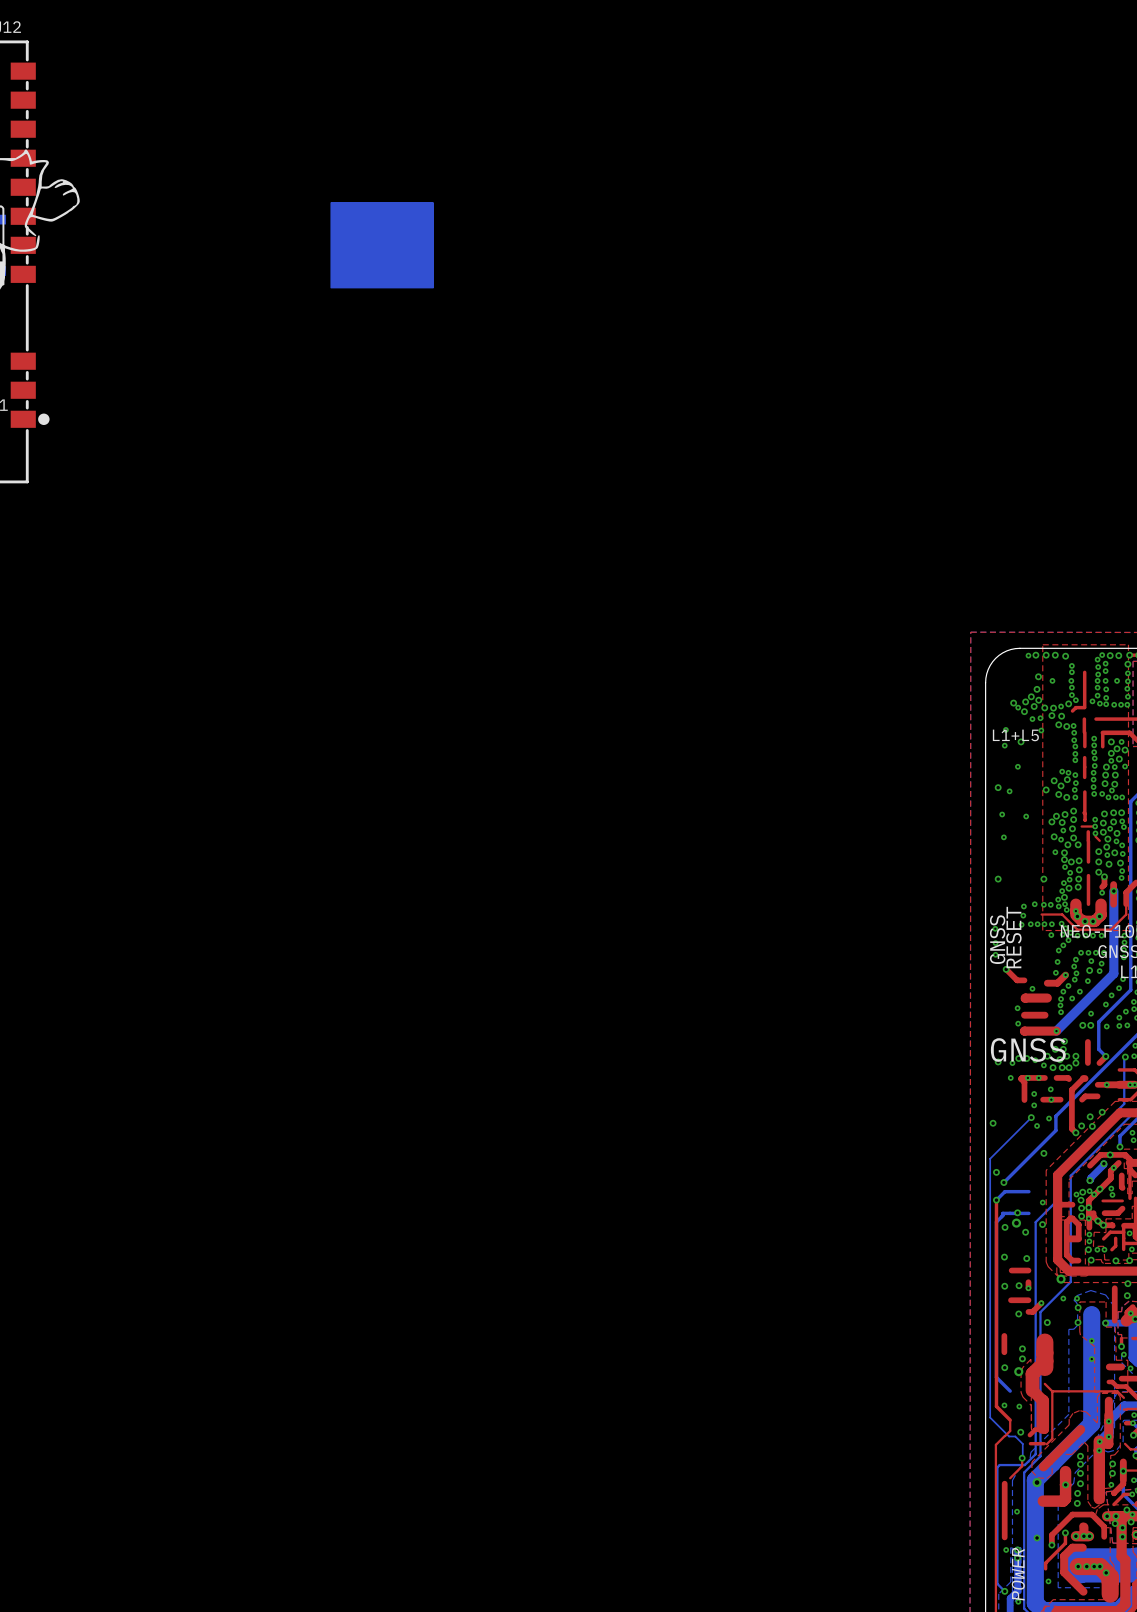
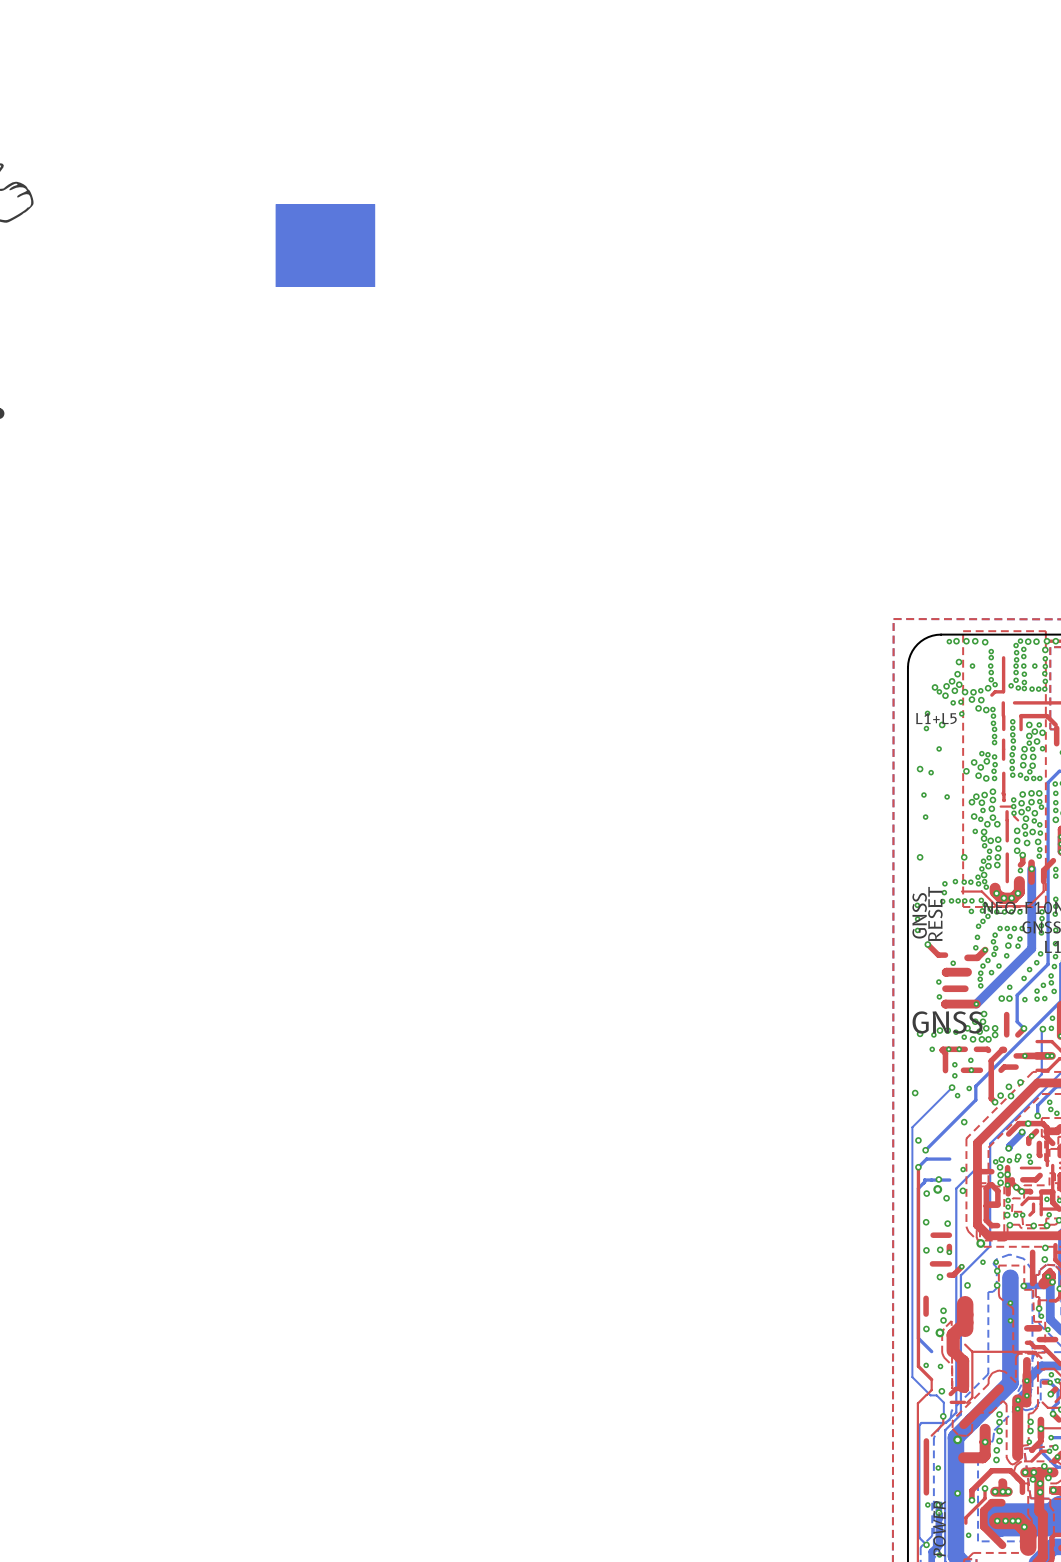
top track: (1075, 904) (1075, 911) -> none
via: (1075, 911) -> none
top track: (1110, 1175) (1110, 1178) (1099, 1189) -> none
top track: (1099, 1189) (1088, 1200) -> none
via: (1089, 1191) -> none
via: none -> (1017, 1159)
via: none -> (1009, 1160)
via: (1094, 1194) -> none

